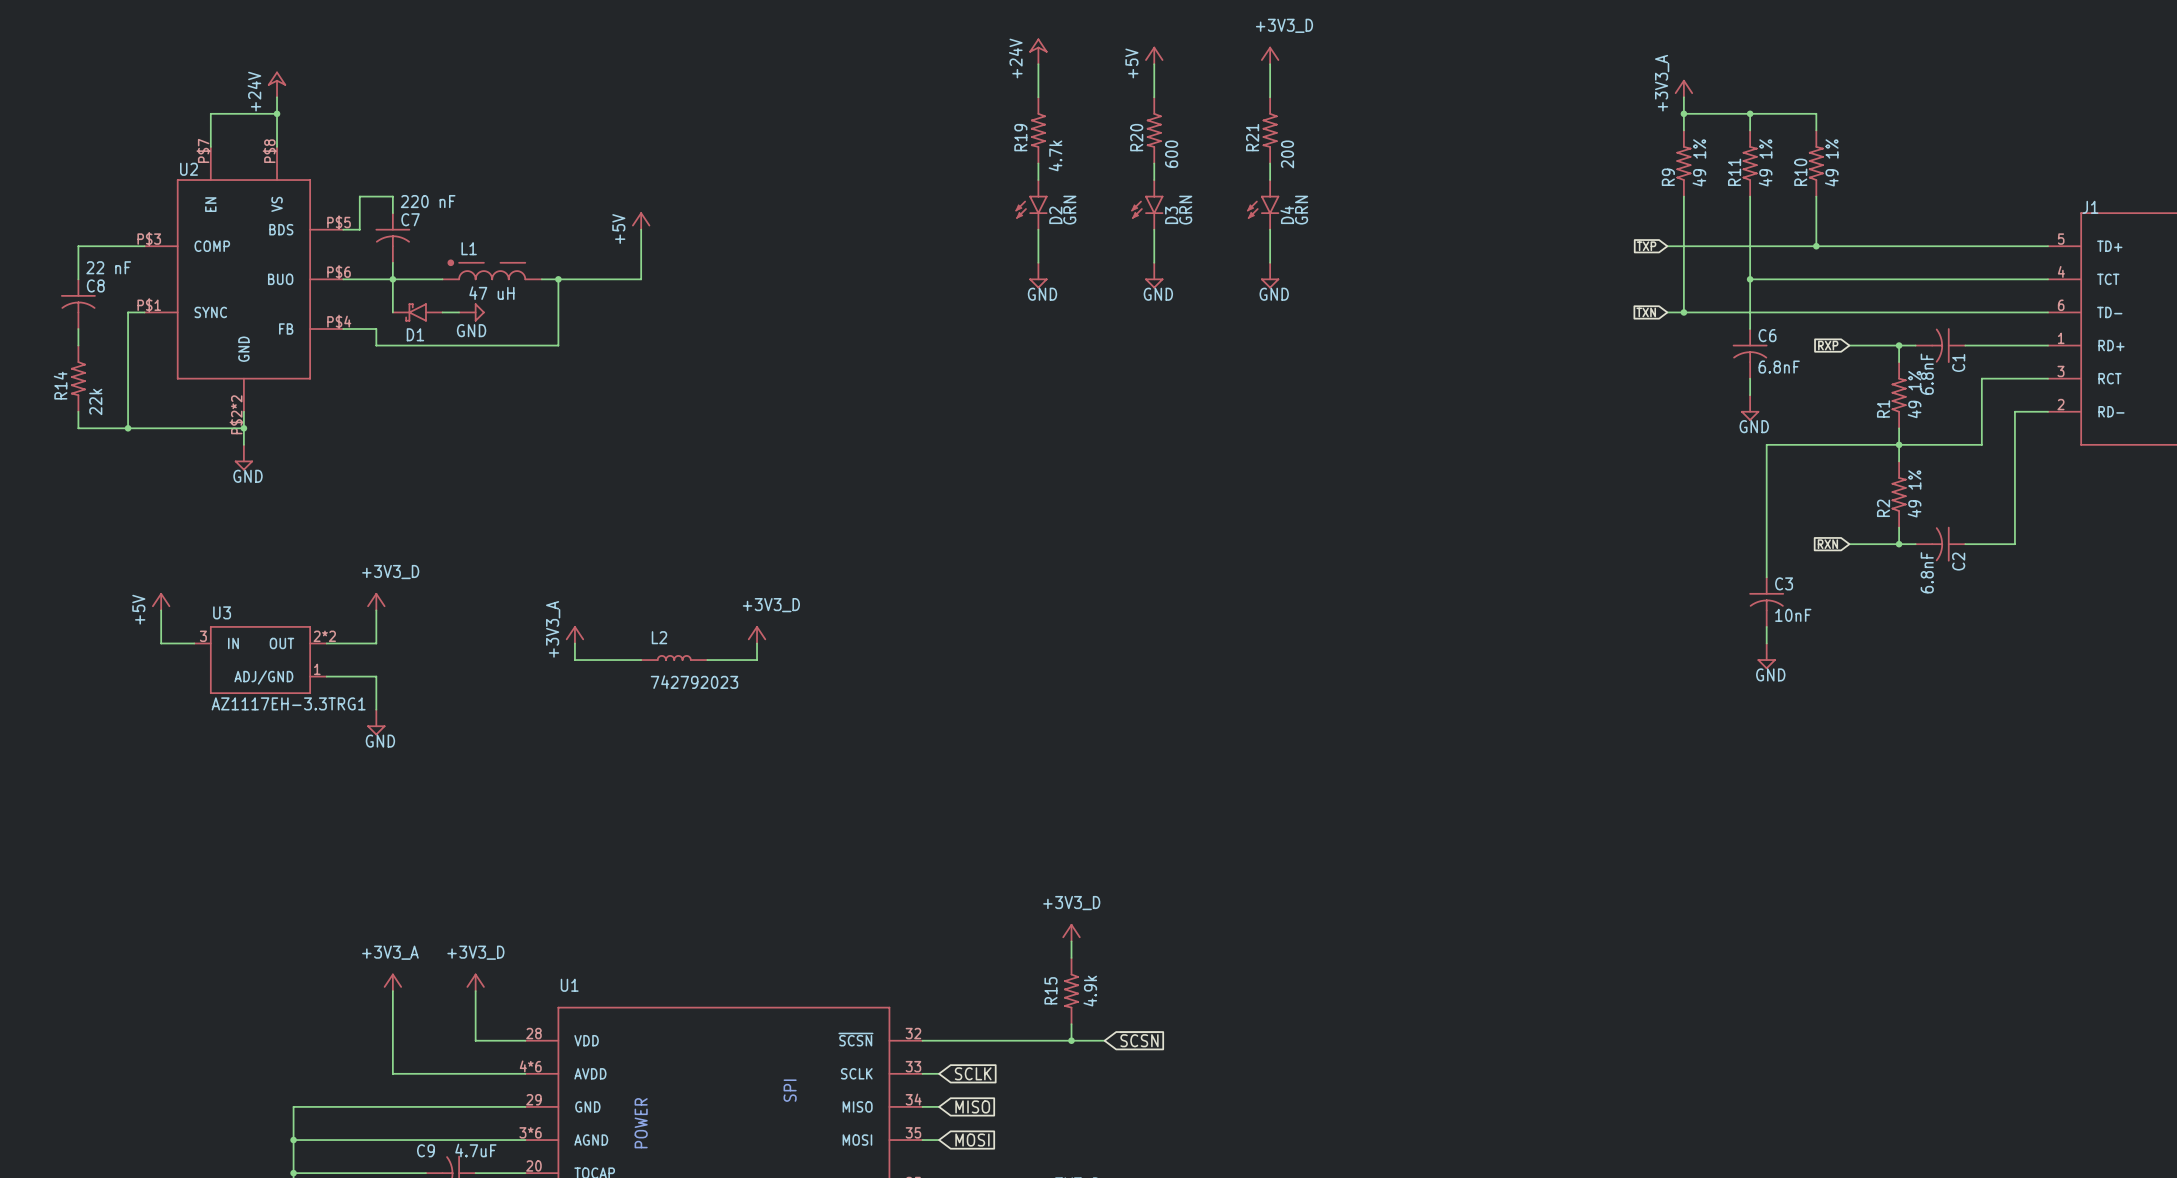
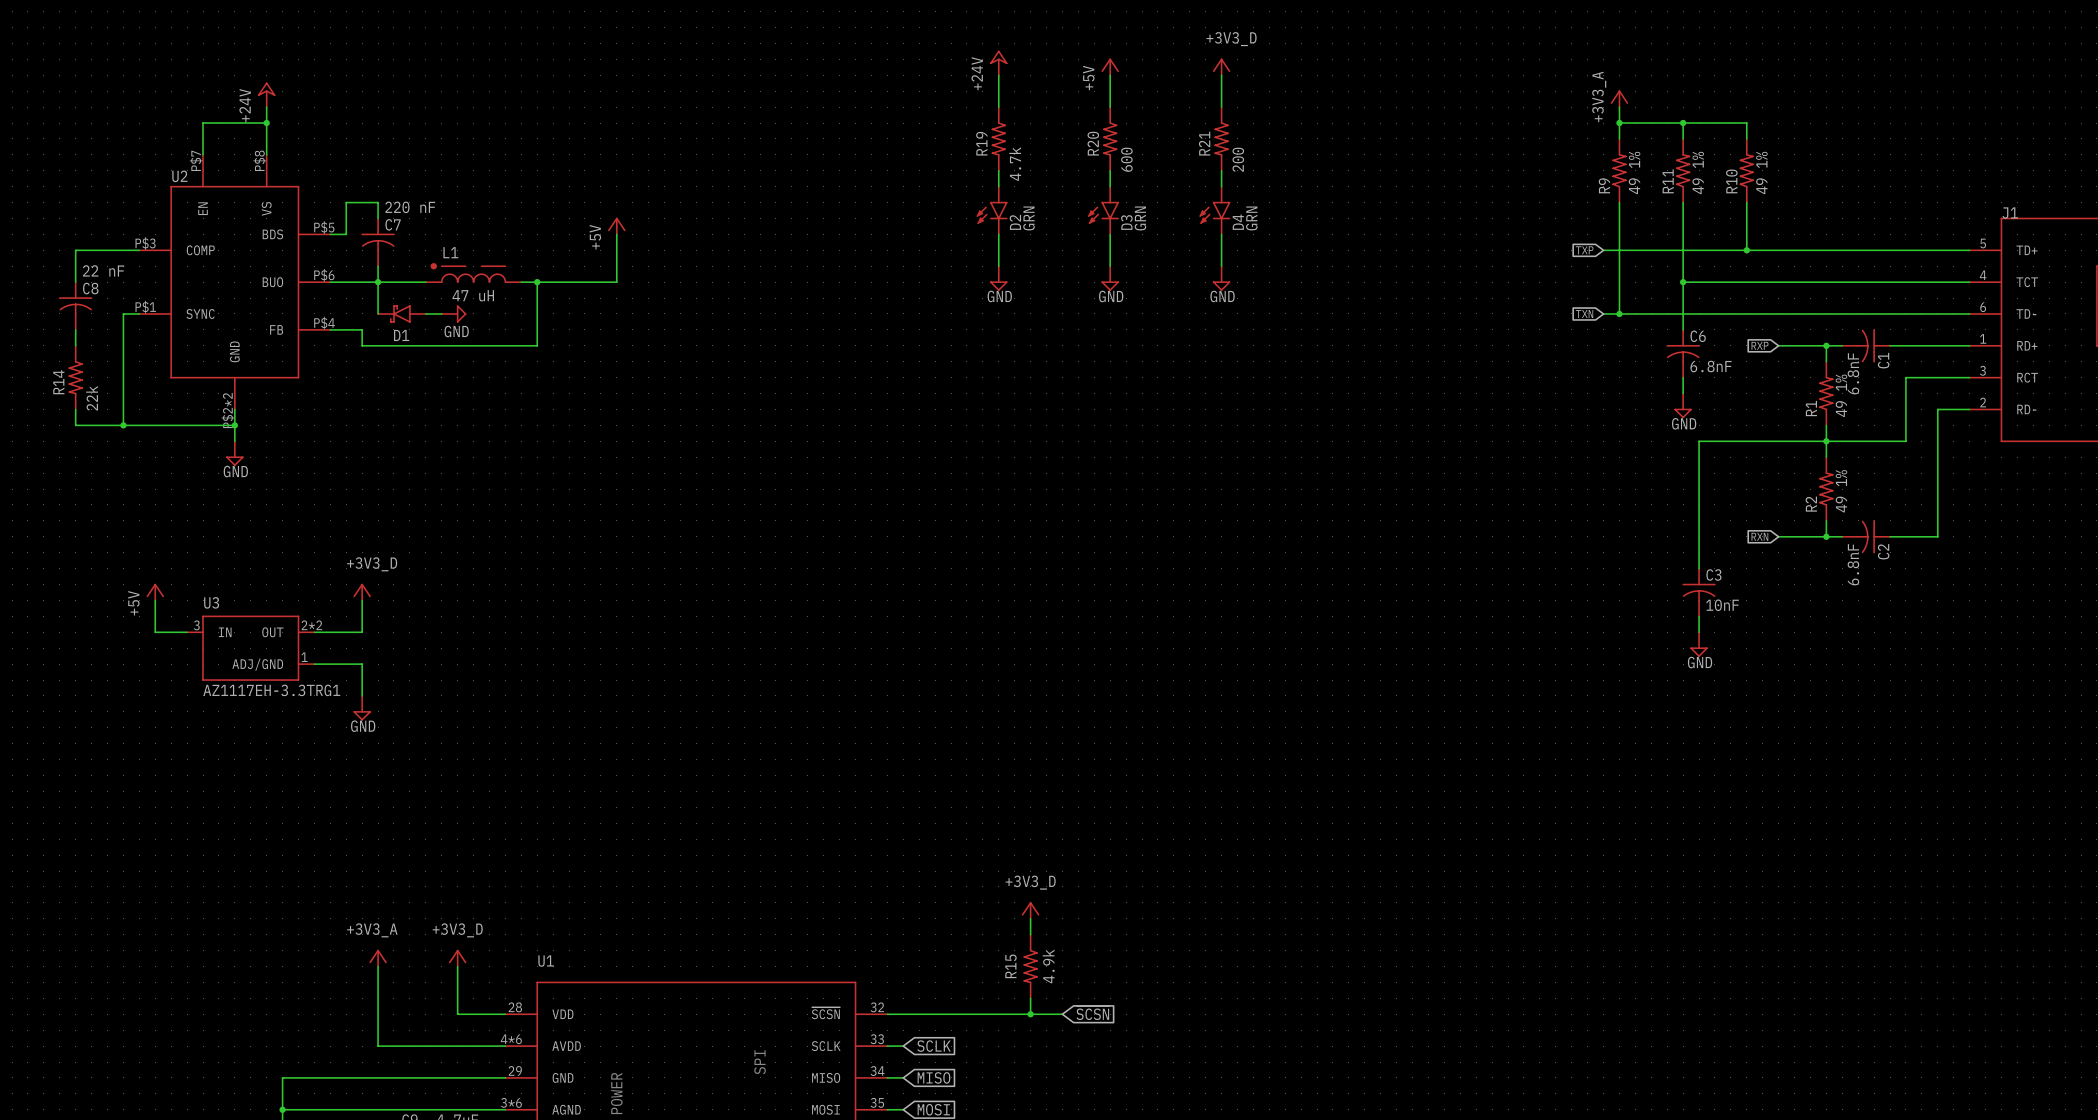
power symbol: +3V3_A (574, 634) -> none
power symbol: +3V3_D (757, 634) -> none
wire: (574, 643) (574, 660) (641, 660) -> none
wire: (757, 643) (757, 660) (707, 660) -> none
L2: 742792023 (674, 657) -> none

